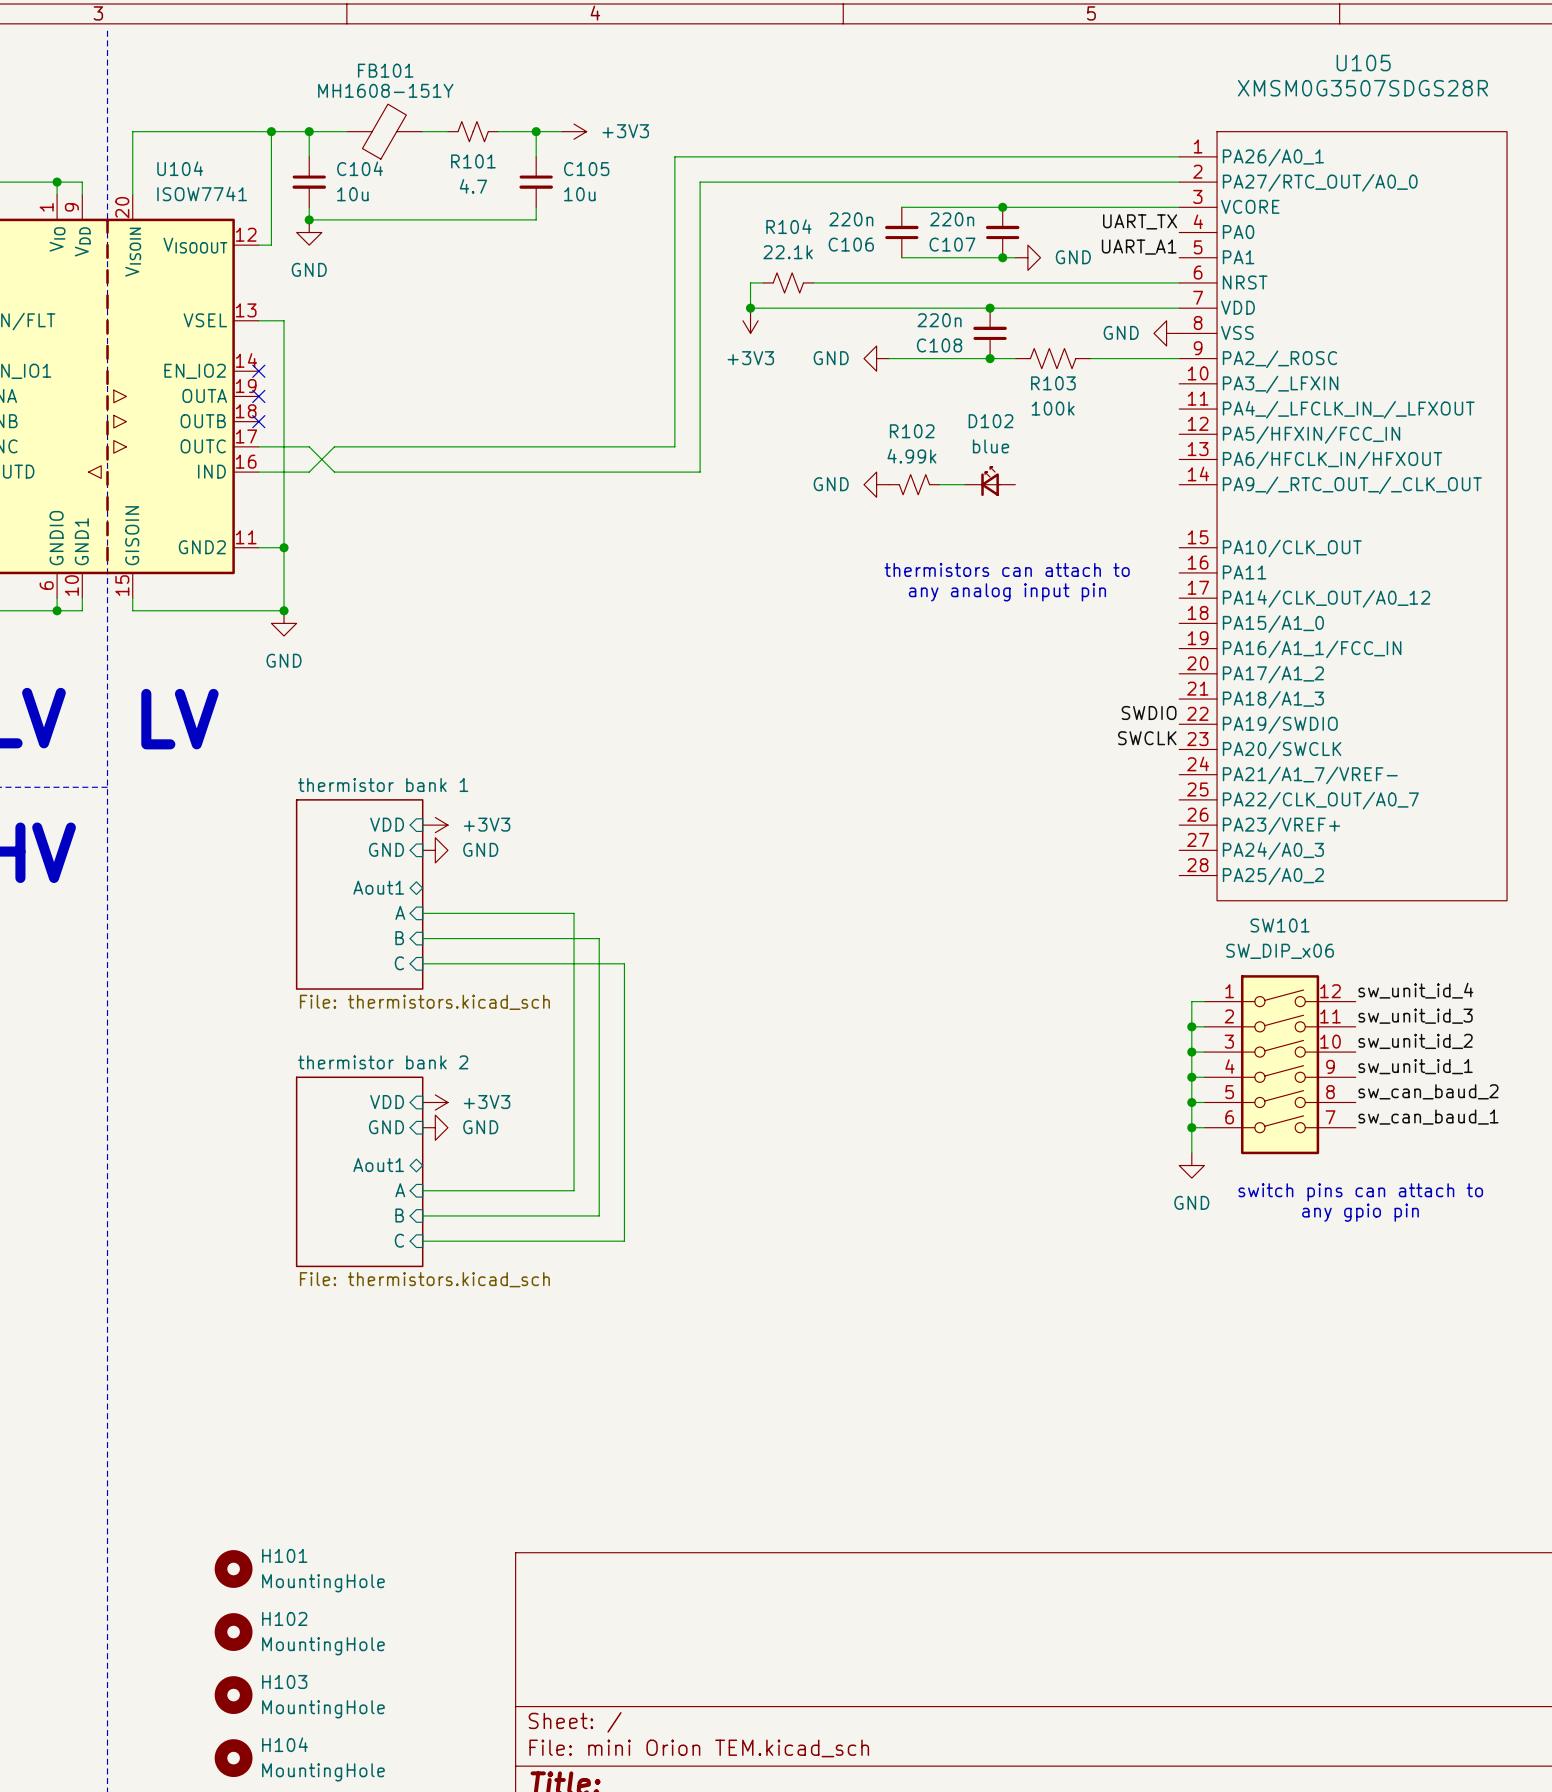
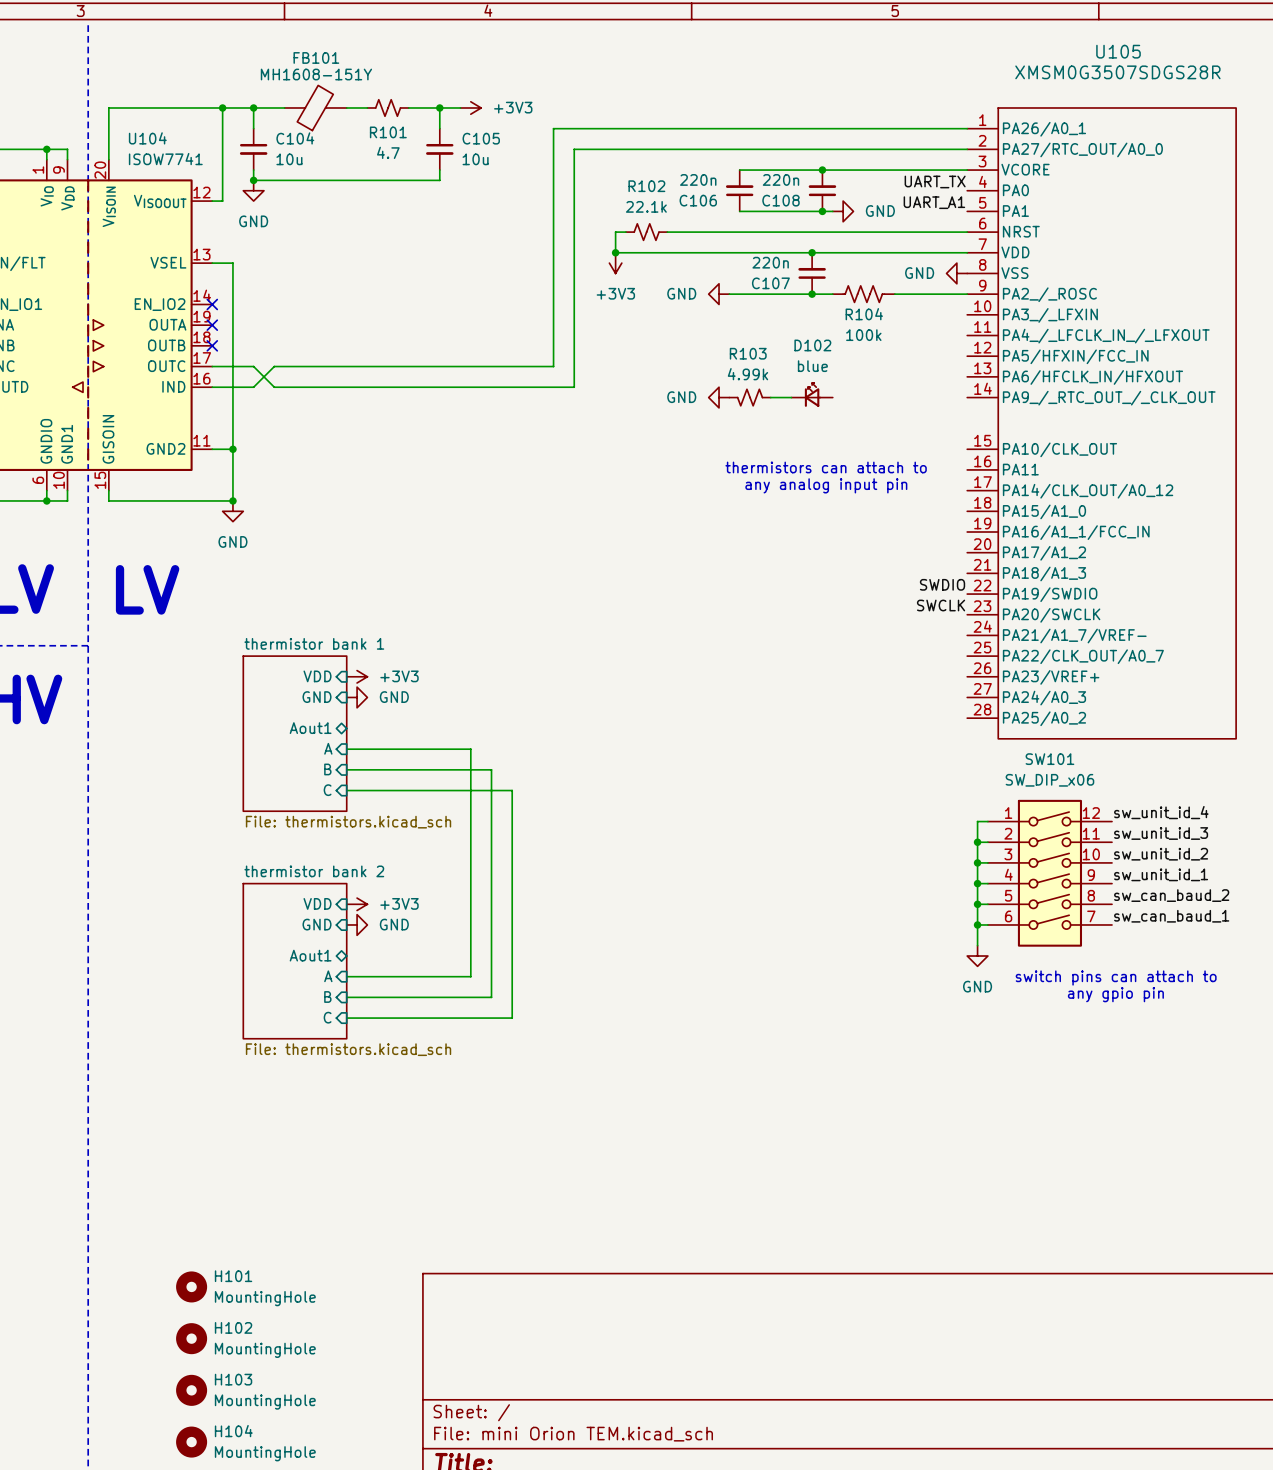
R104 name: R104 (788, 226) -> R102 (646, 186)
C107 name: C107 (952, 244) -> C108 (780, 200)
C108 name: C108 (939, 345) -> C107 (770, 283)
R103 name: R103 (1053, 383) -> R104 (864, 314)
R102 name: R102 (912, 431) -> R103 (748, 353)

